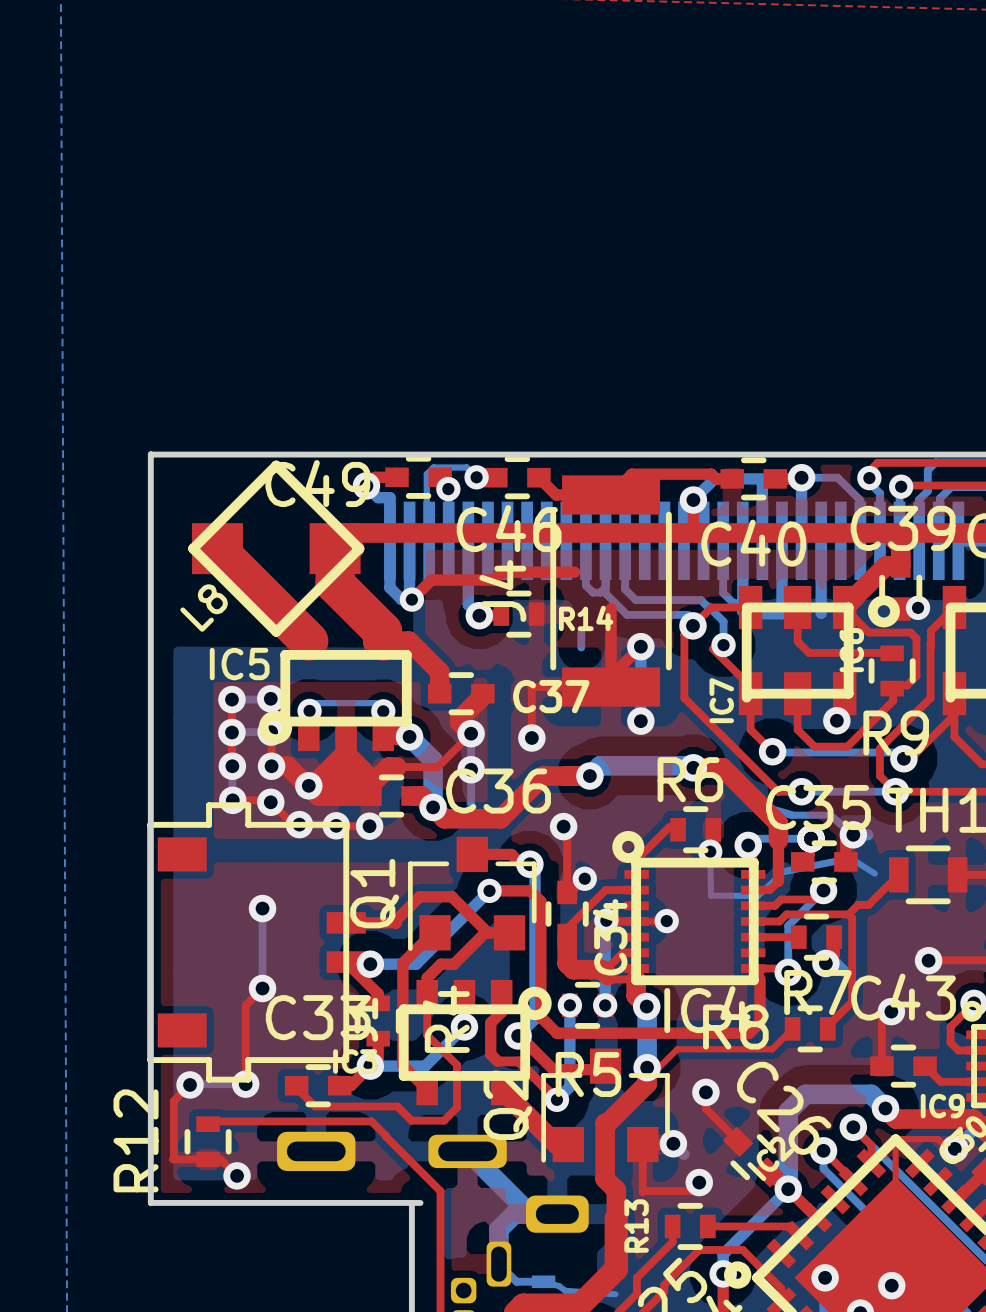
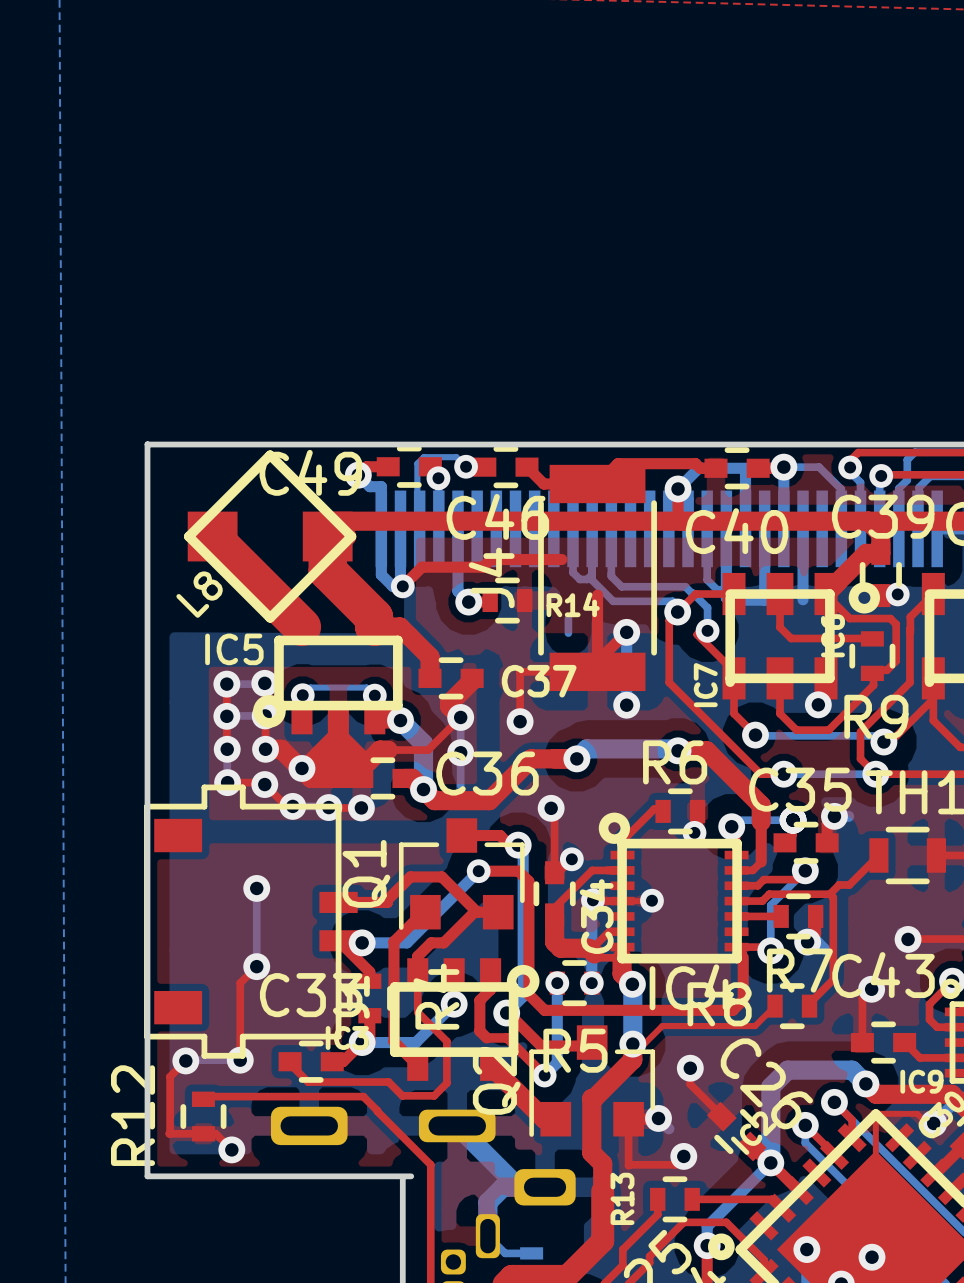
bottom track: (751, 803) (792, 815) (830, 815) (853, 834) -> none
bottom track: (710, 851) (711, 895) (758, 895) (783, 871) (850, 858) (874, 873) -> none
bottom track: (543, 1281) (558, 1286) (565, 1290) (615, 1294) -> none

